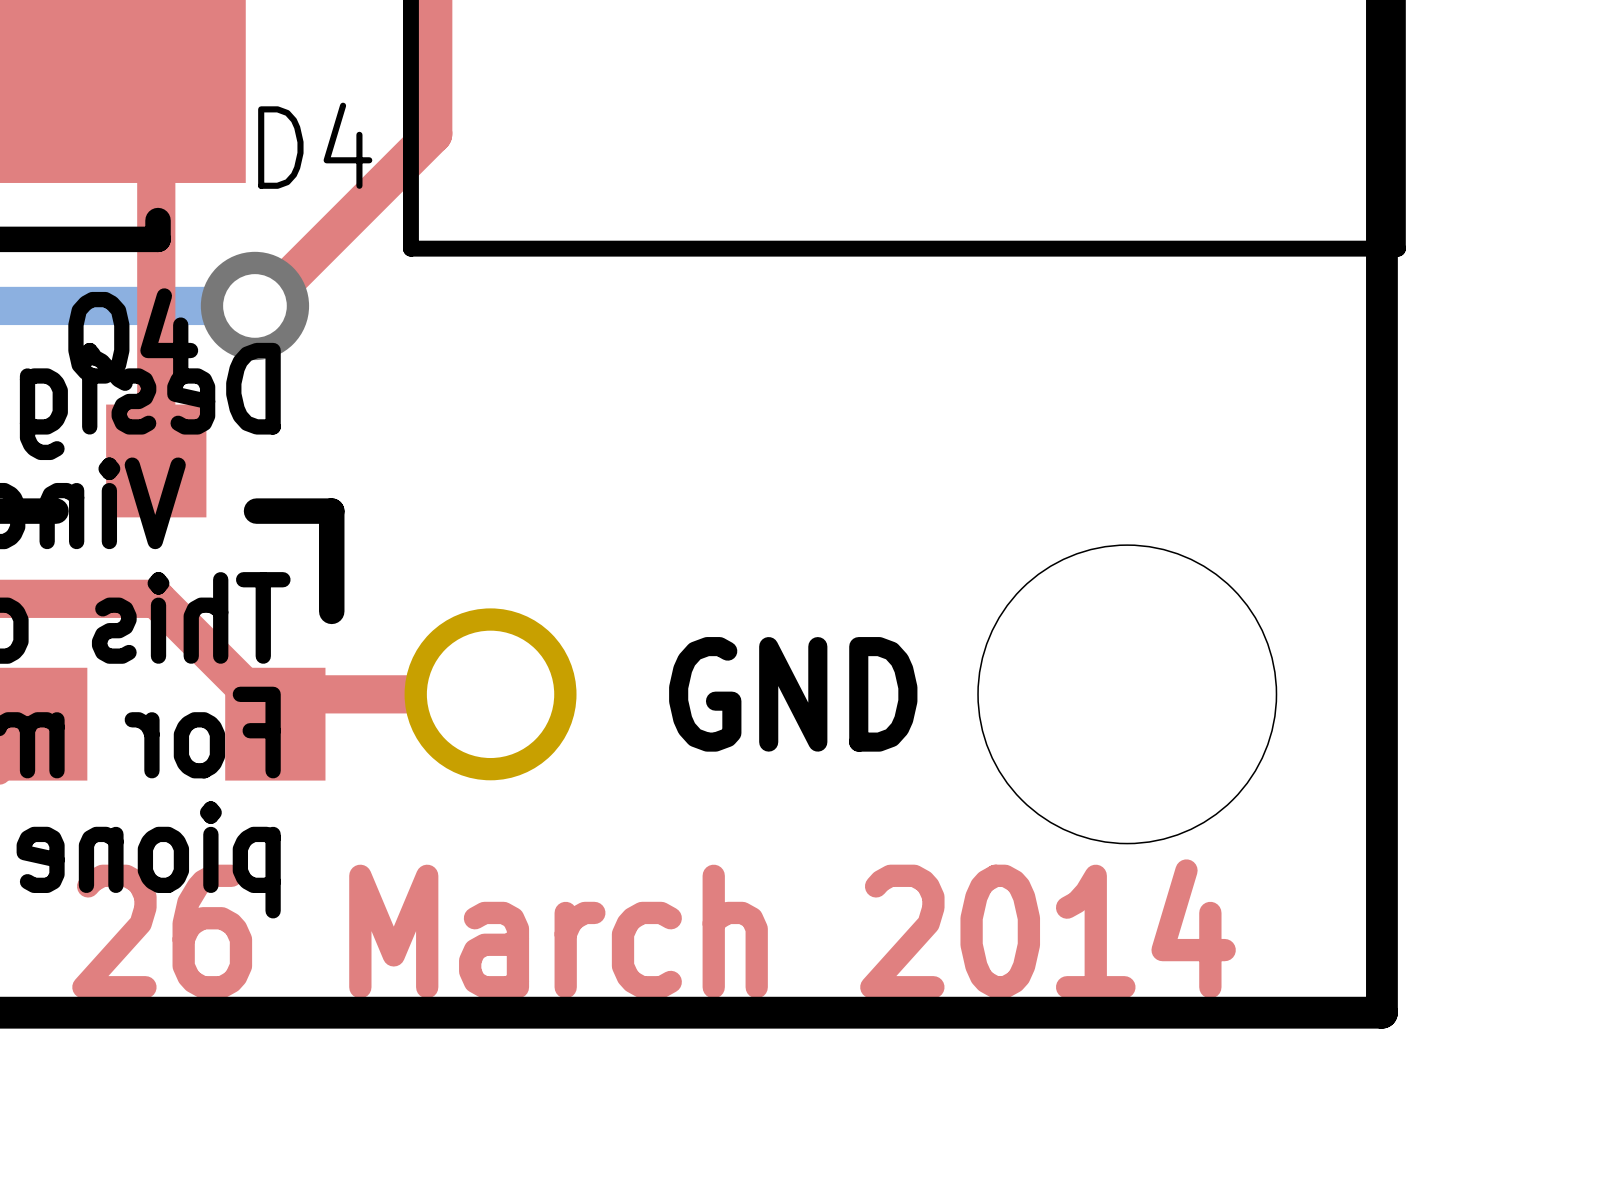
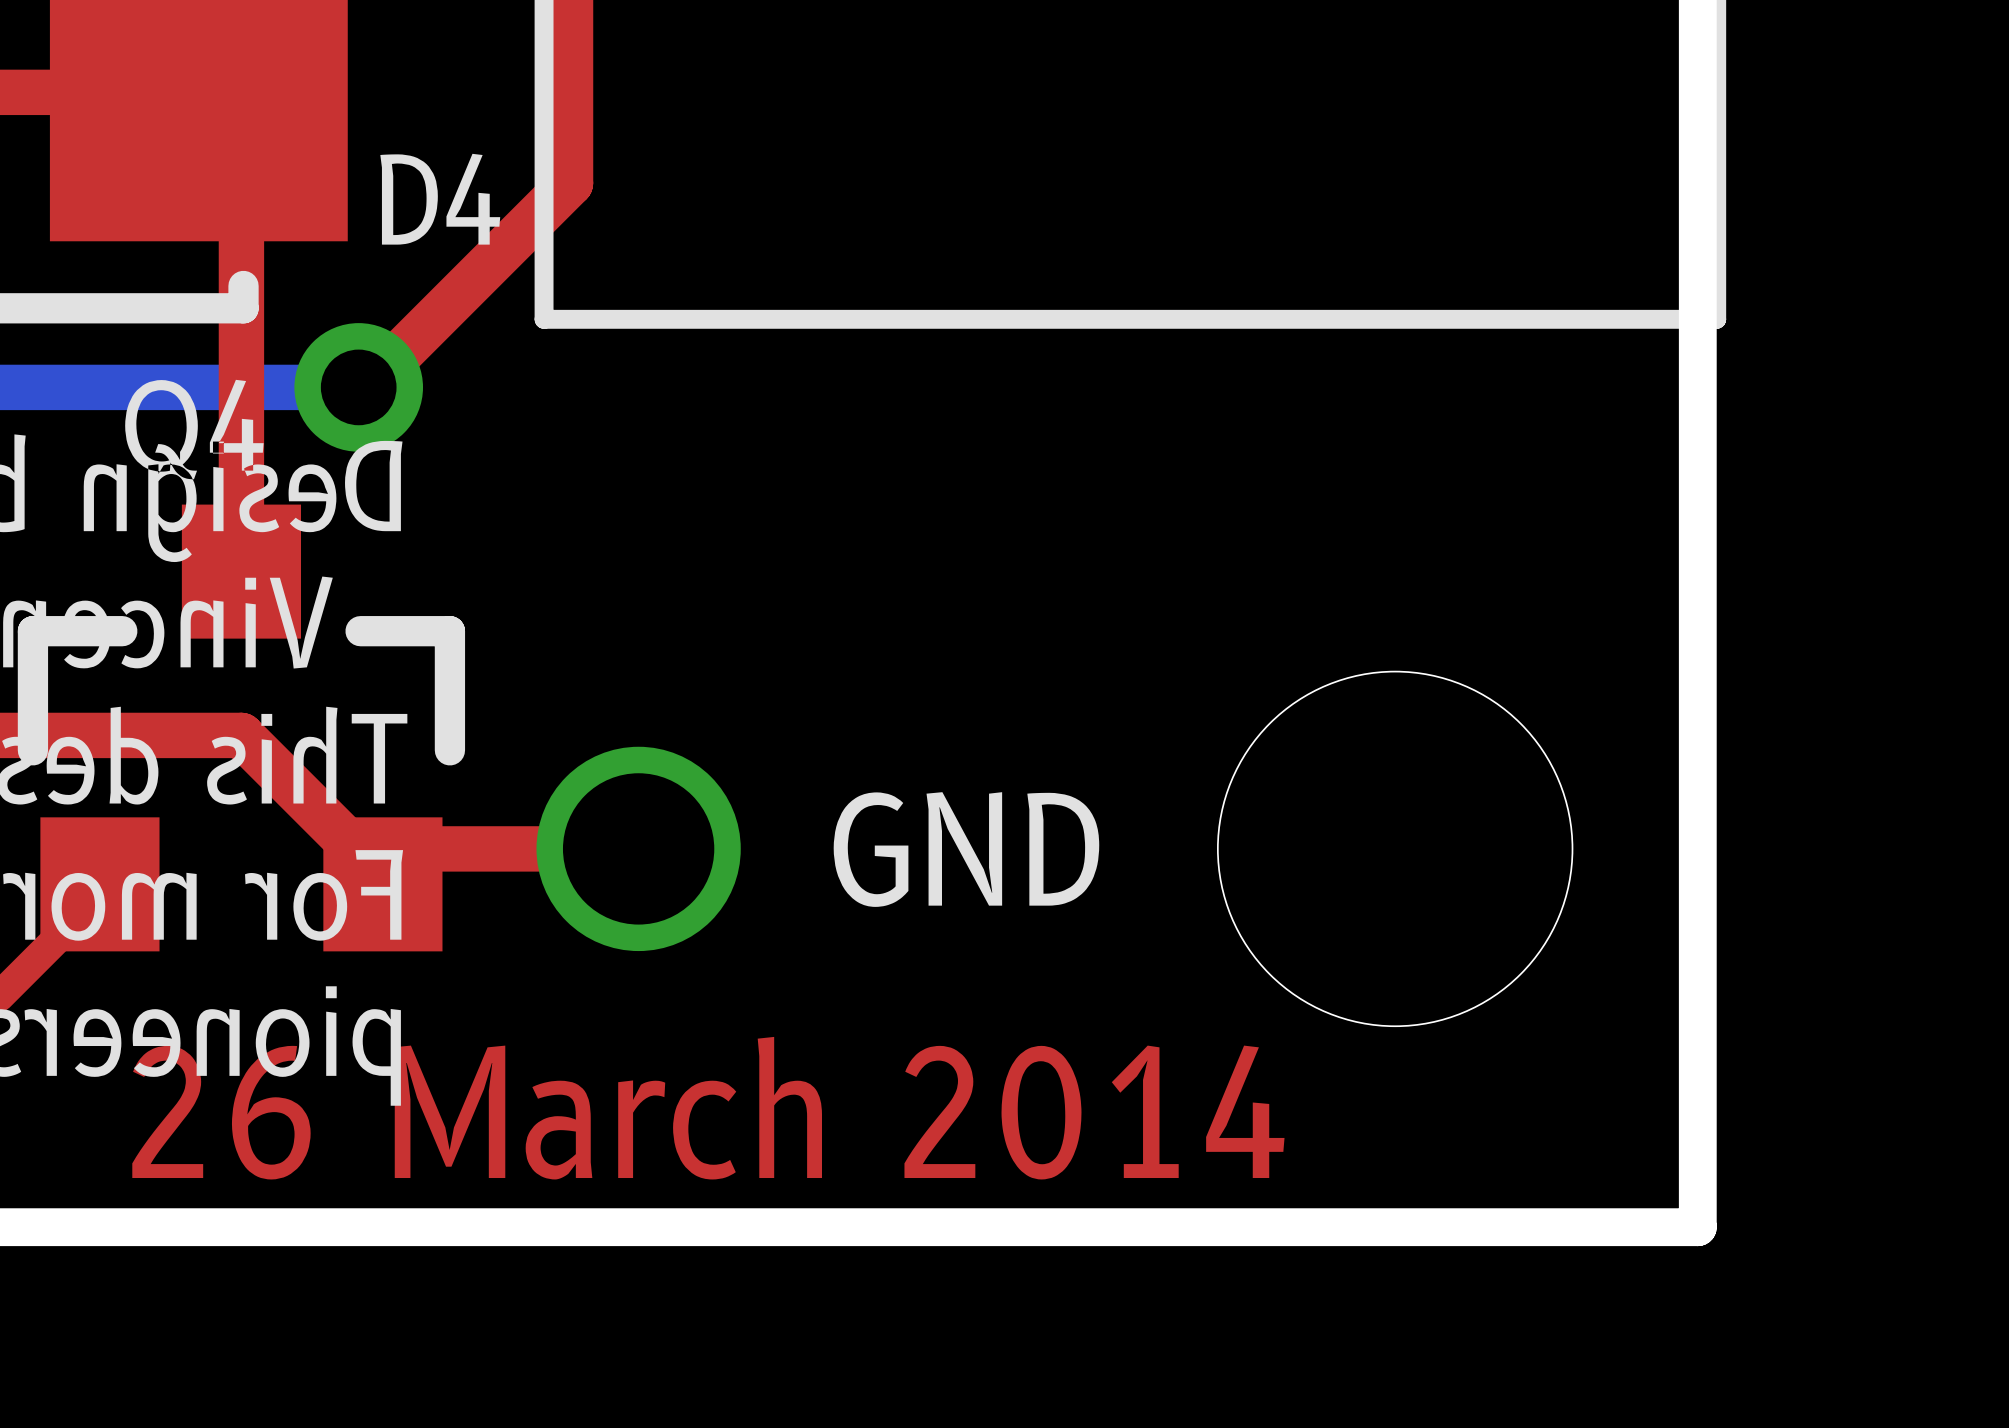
text position: 26 March 2014 (654, 928) -> 26 March 2014 (708, 1108)

